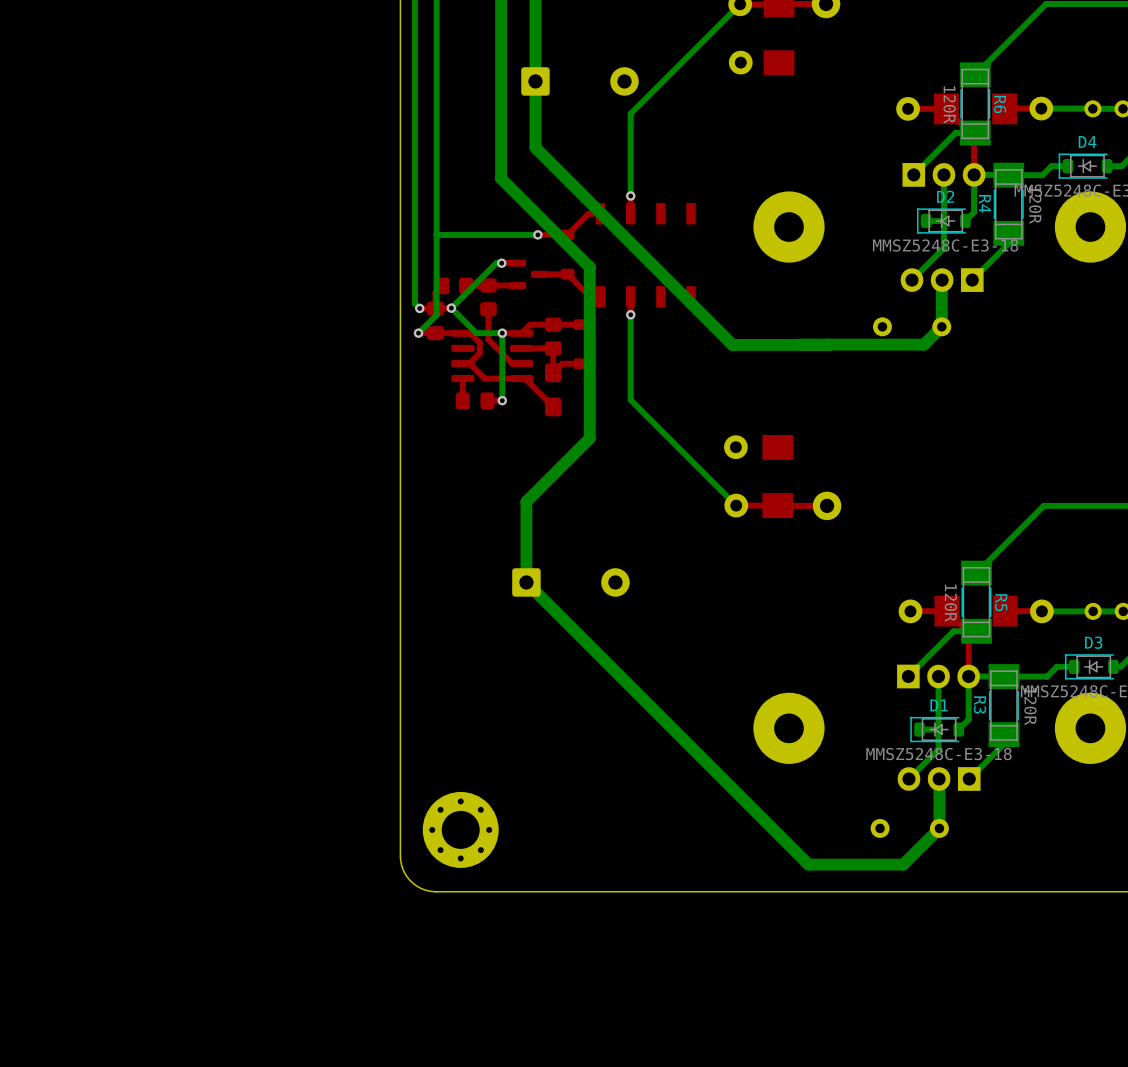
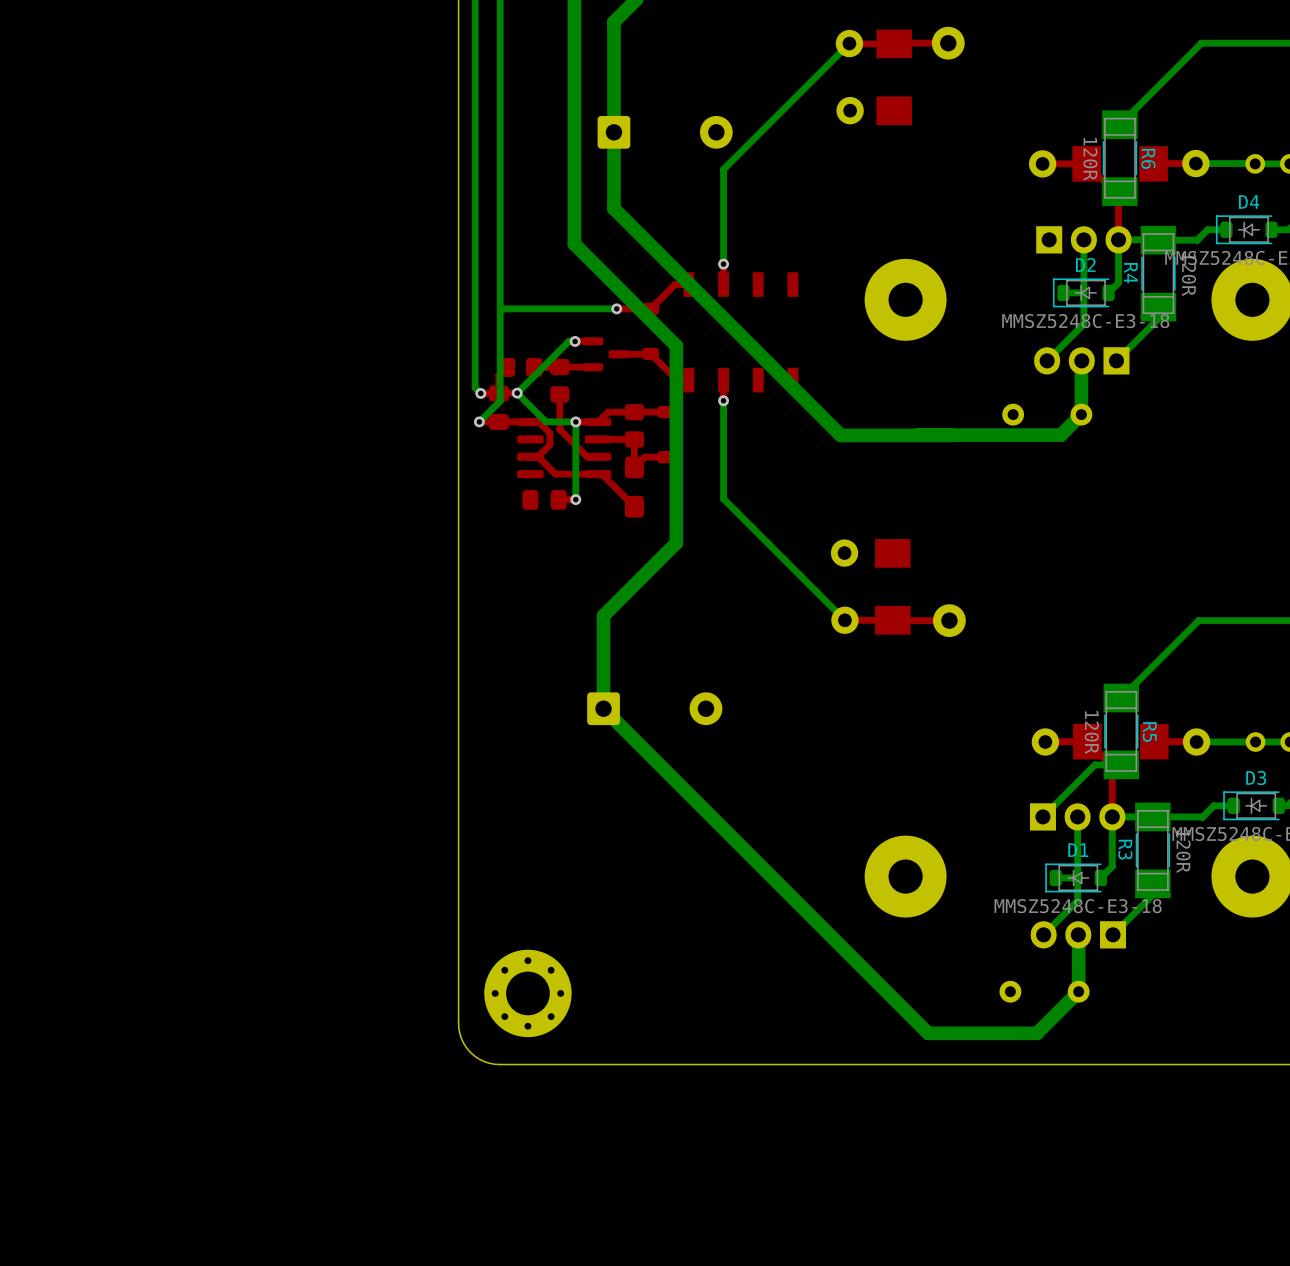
bottom track: (975, 132) (955, 132) (913, 174) -> none
top track: (462, 378) (462, 400) -> none

